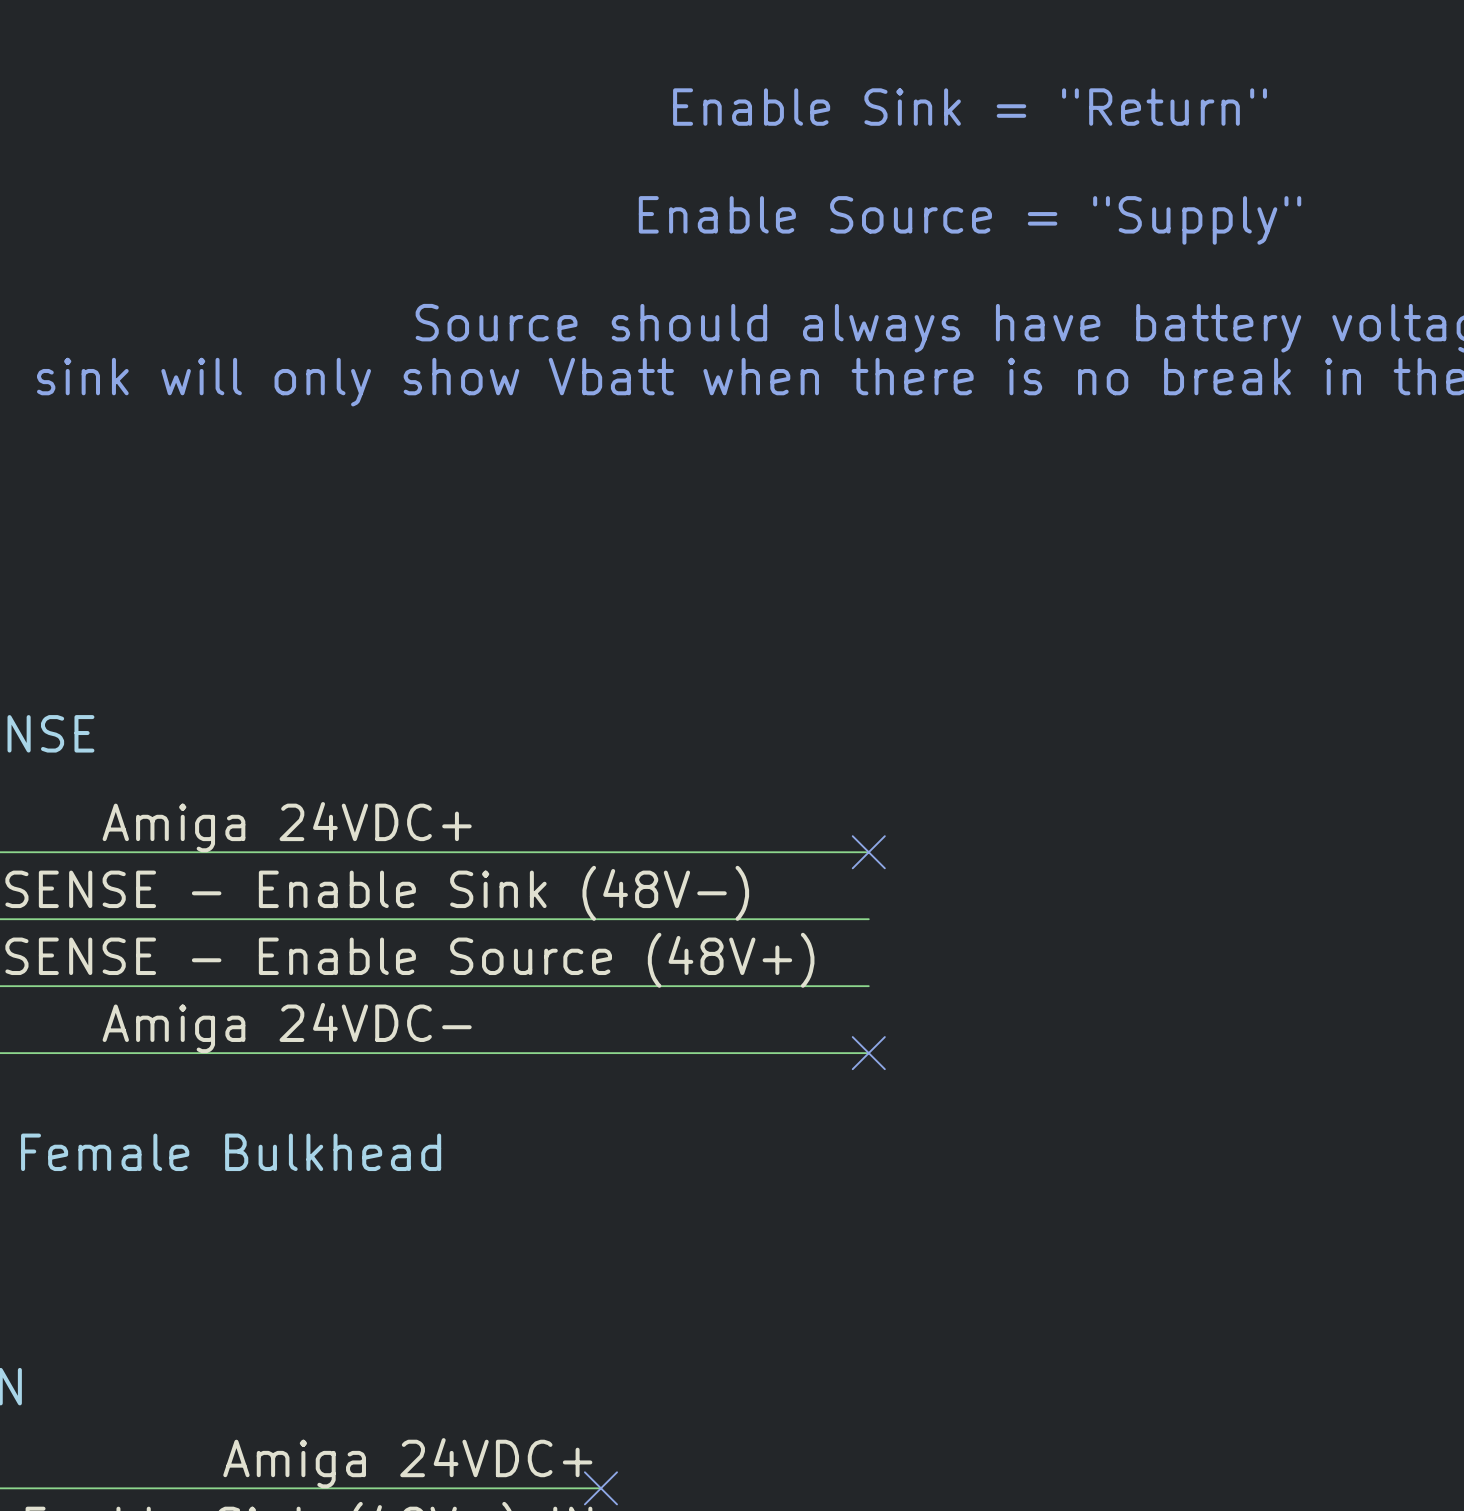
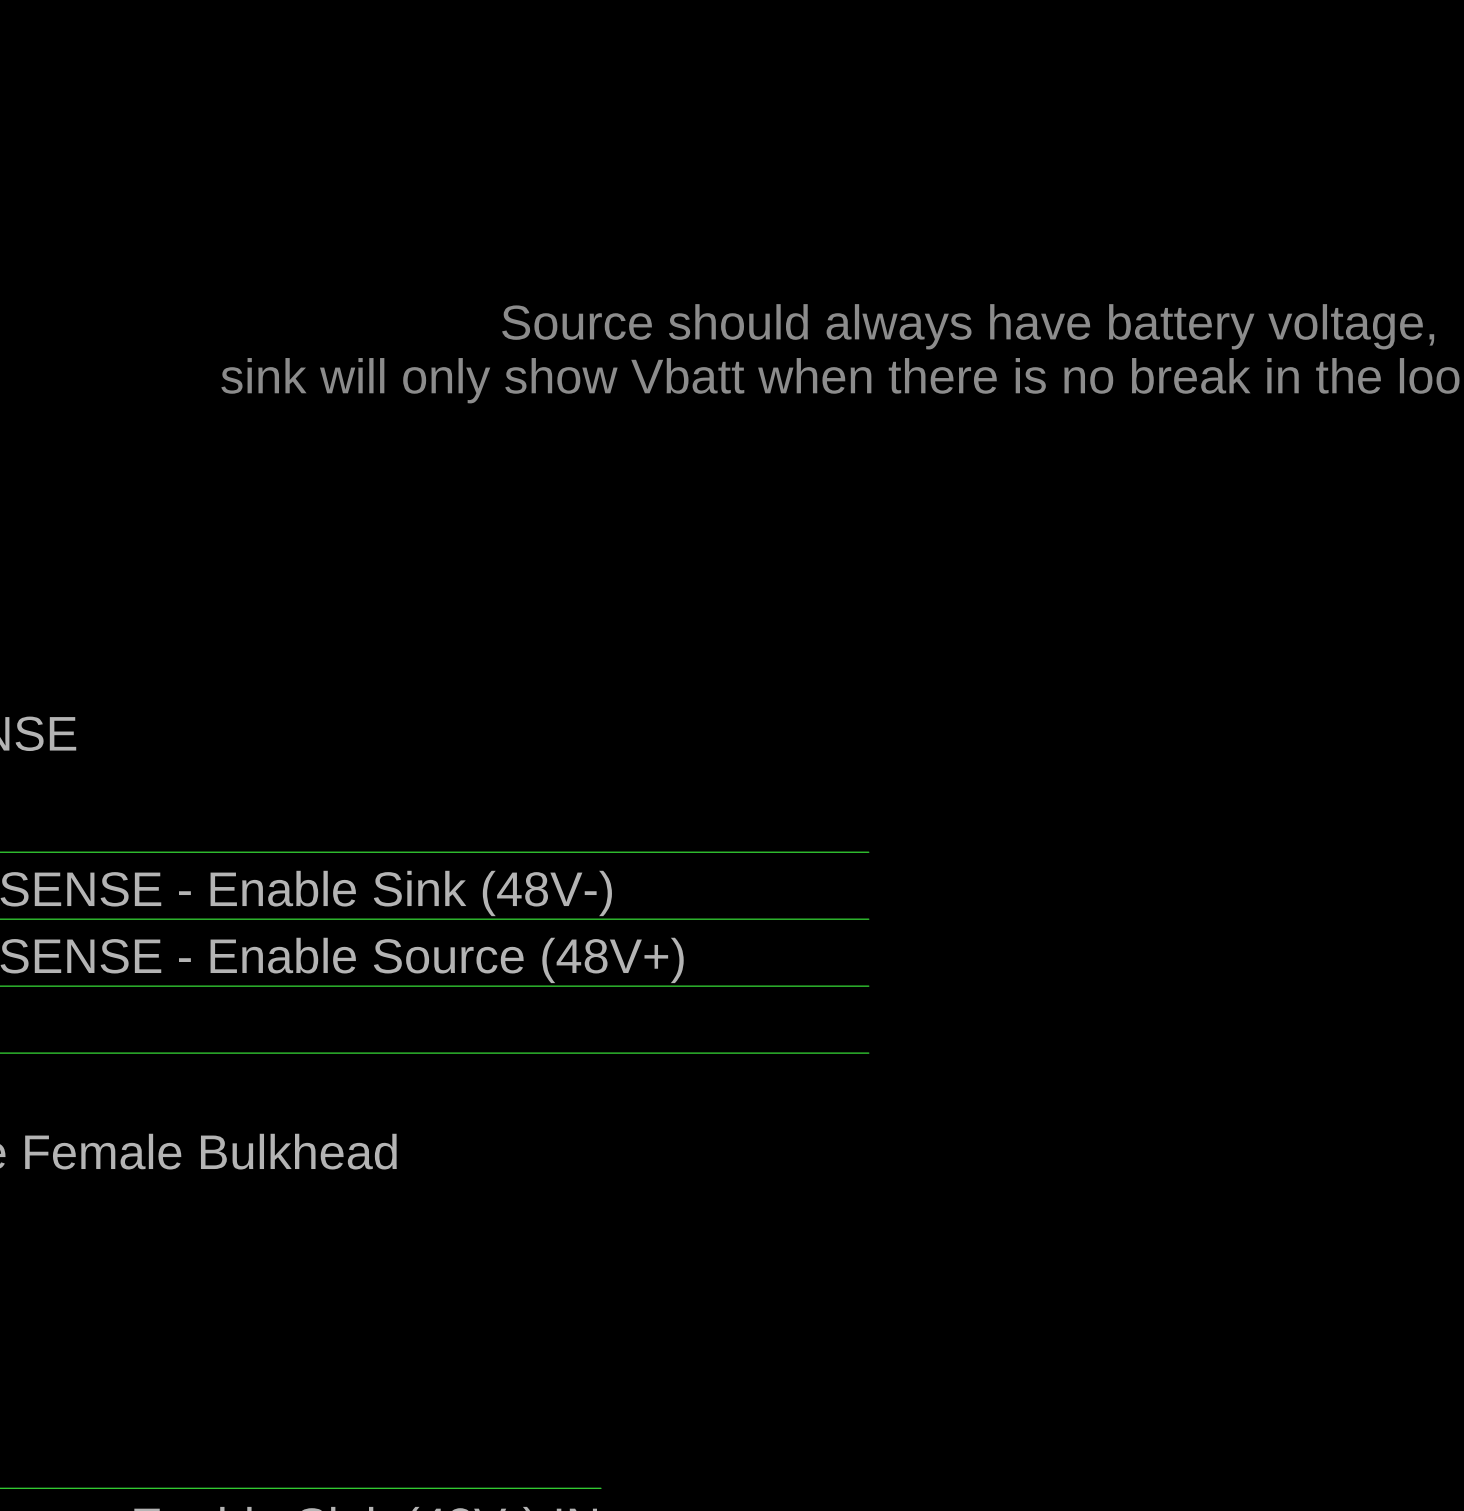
text: Enable Sink = "Return" (970, 107) -> none
text: Enable Source = "Supply" (970, 220) -> none
label: Amiga 24VDC+ (287, 827) -> none
no-connect mark: (868, 852) -> none
label: Amiga 24VDC- (287, 1028) -> none
no-connect mark: (868, 1053) -> none
label: Amiga 24VDC+ (407, 1463) -> none
no-connect mark: (600, 1488) -> none

